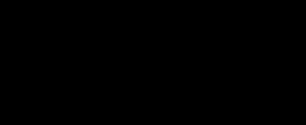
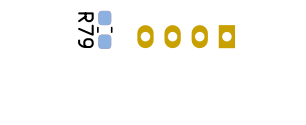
R79: none -> (104, 29)
part: none -> (186, 36)

